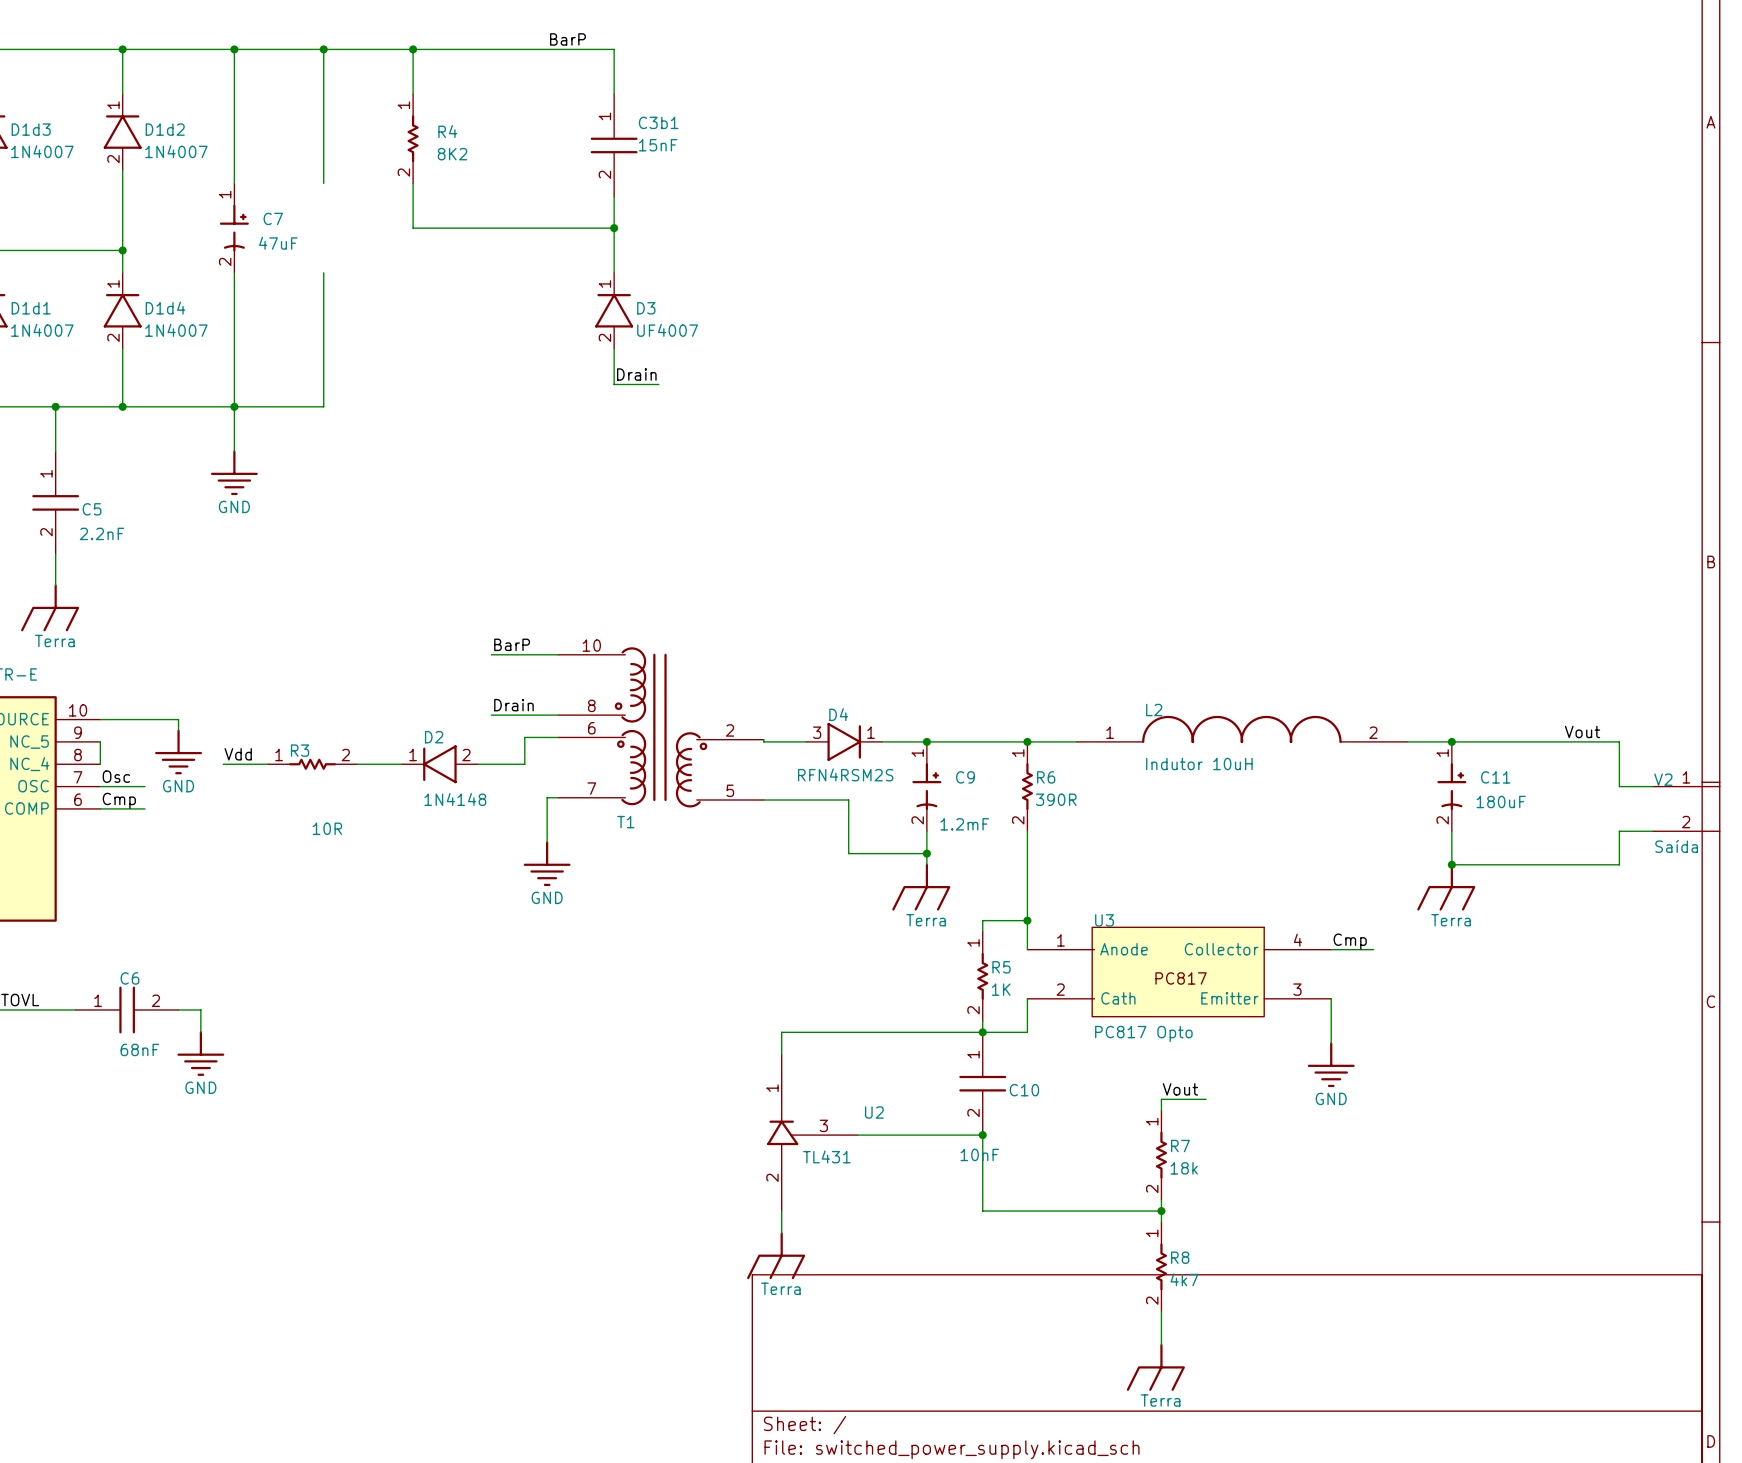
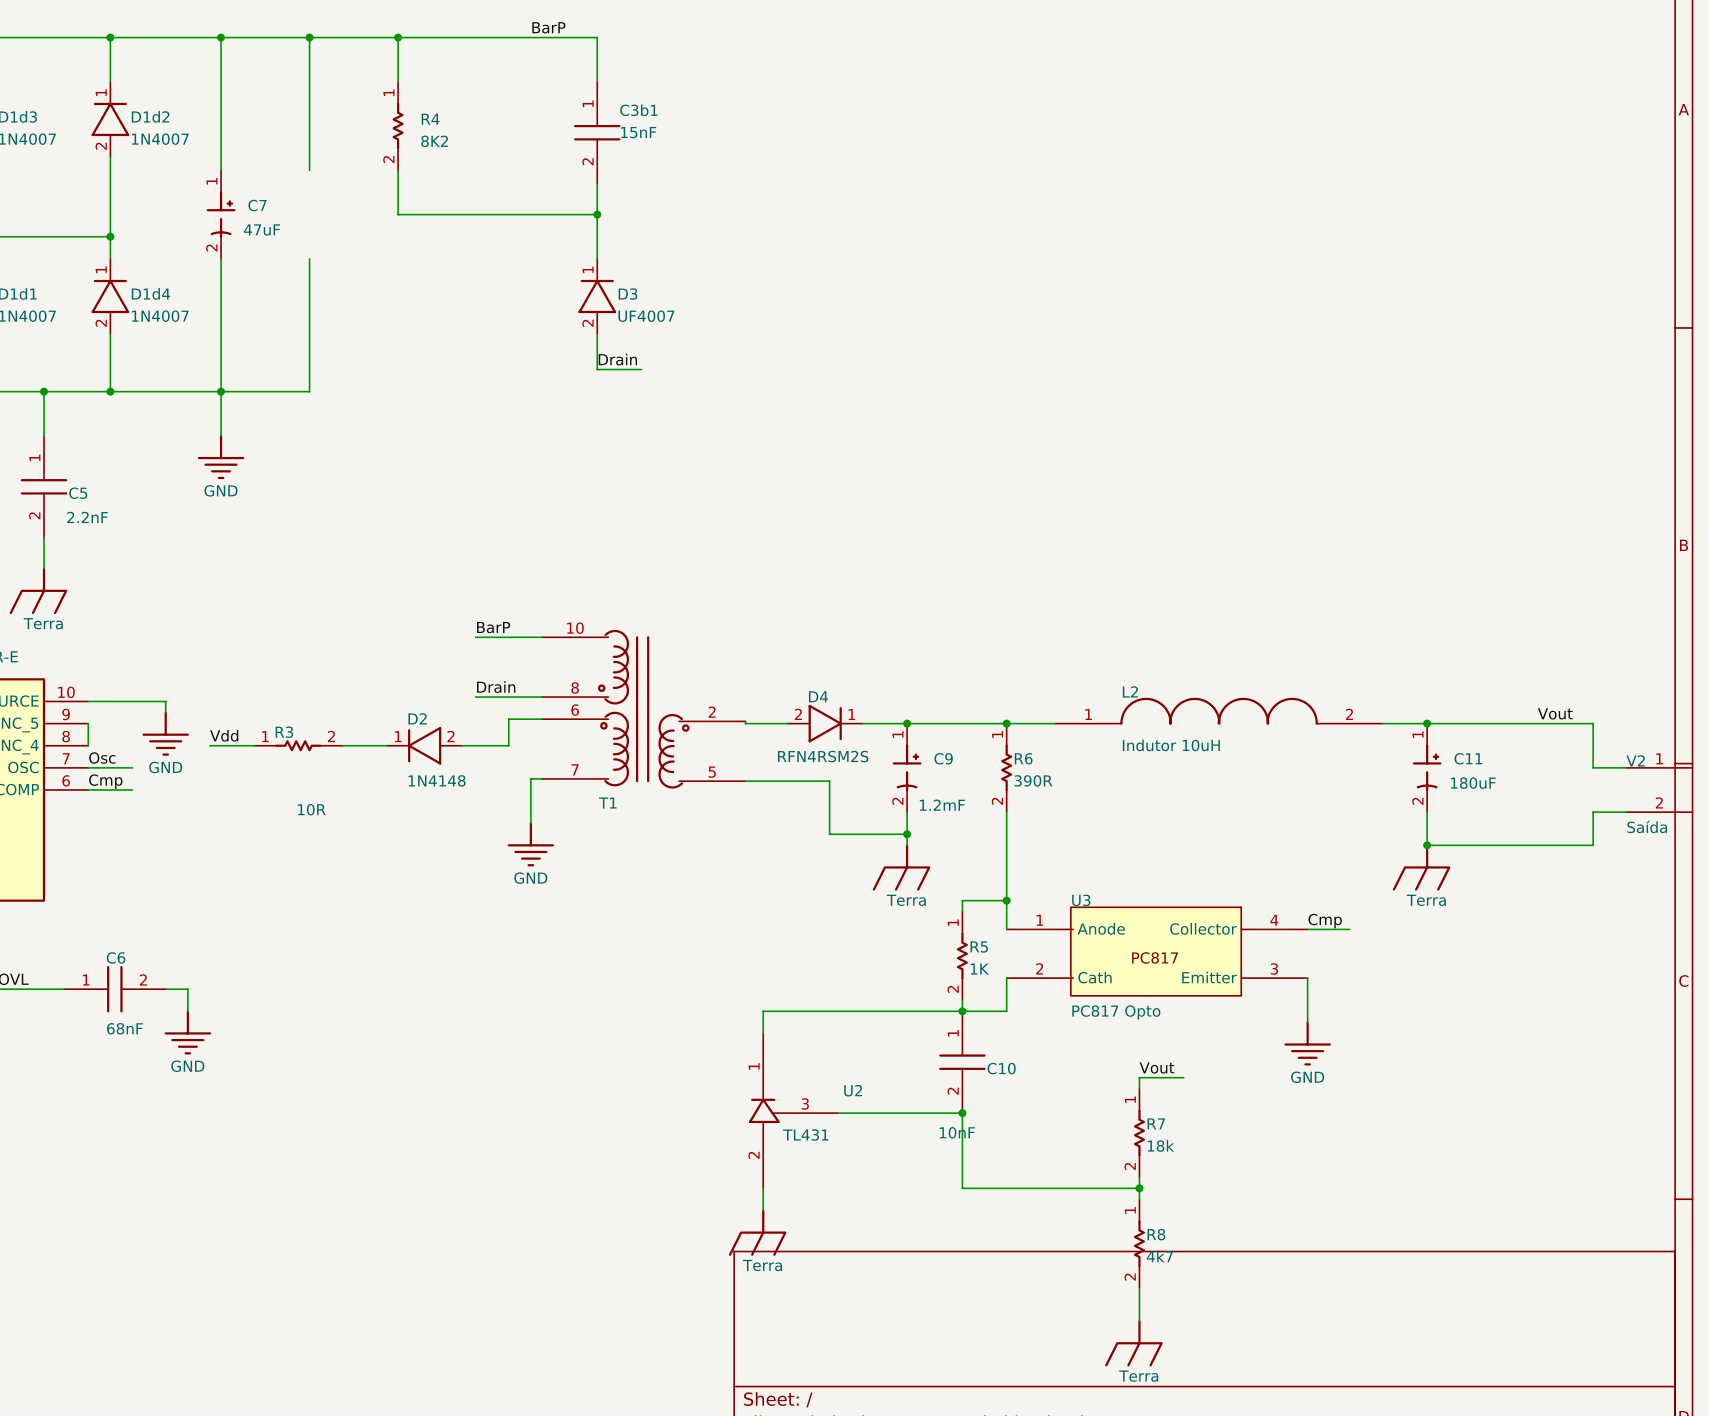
D4 pin number: 3 (817, 732) -> 2 (798, 714)

